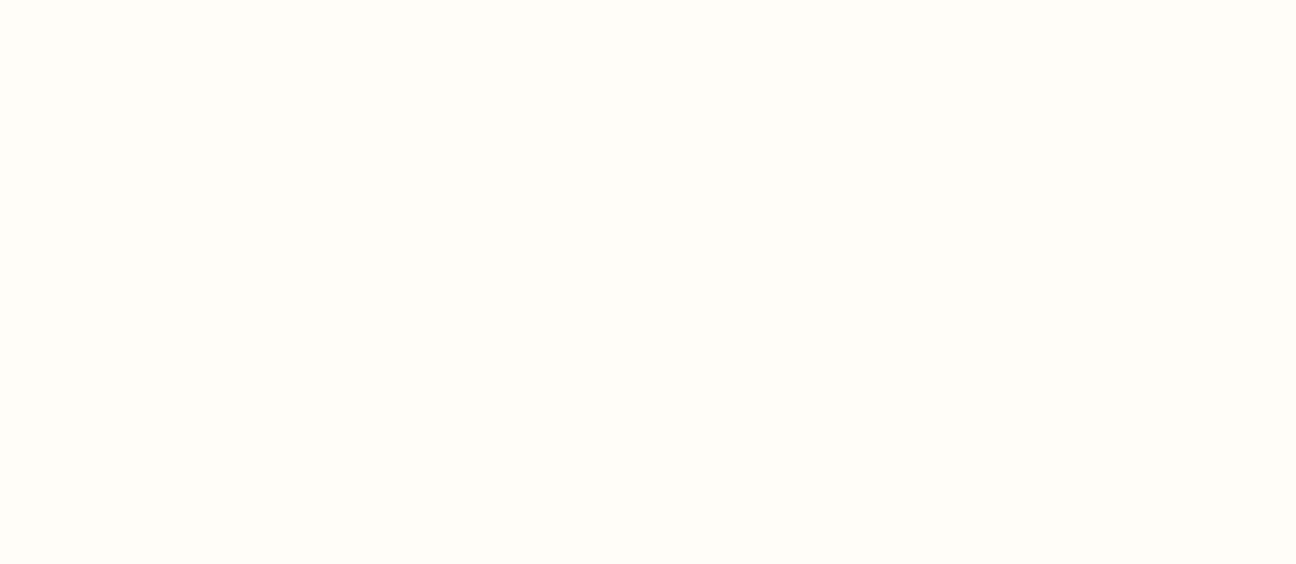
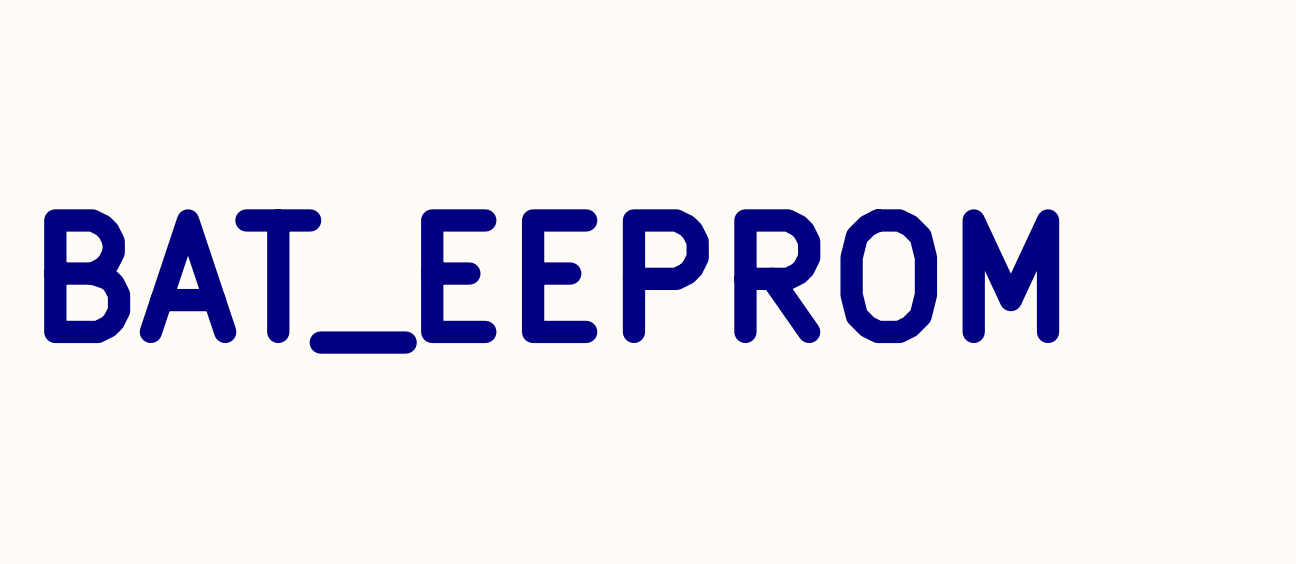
text: none -> BAT_EEPROM (551, 281)

